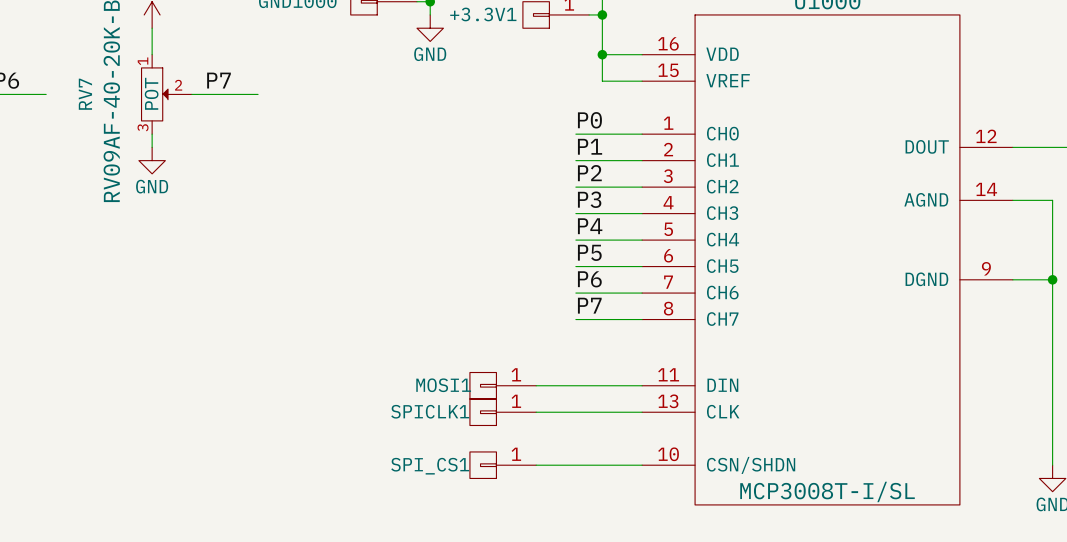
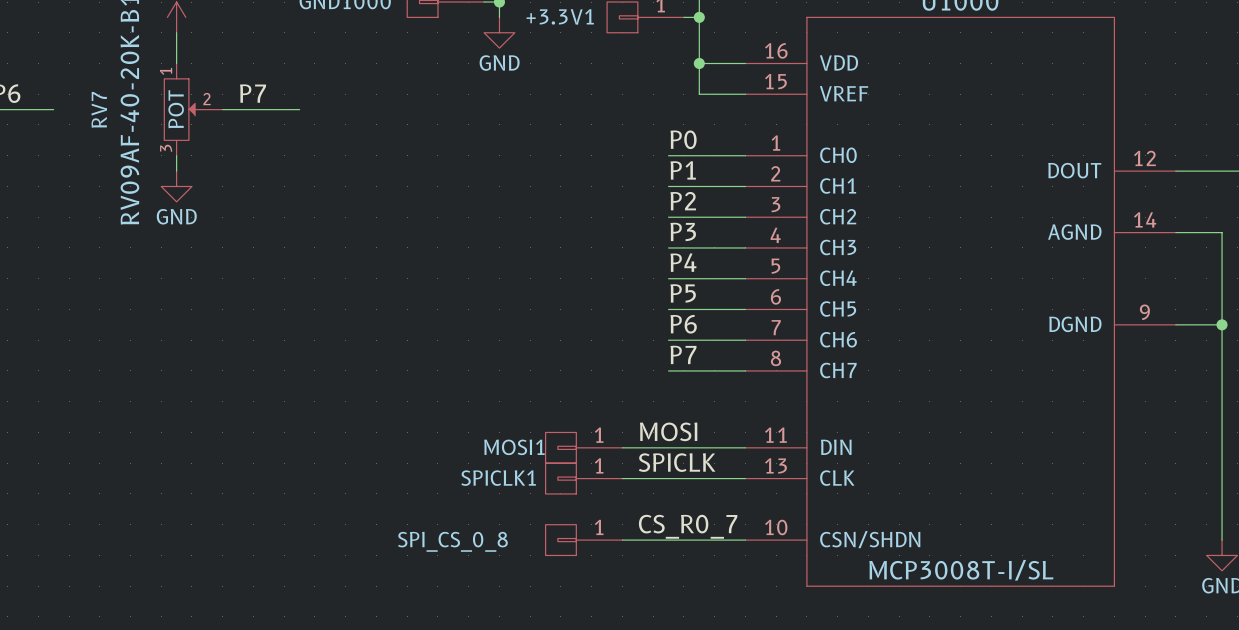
label: none -> MOSI (668, 431)
label: none -> SPICLK (677, 462)
label: none -> CS_R0_7 (688, 526)
SPI_CS1 name: SPI_CS1 (430, 466) -> SPI_CS_0_8 (452, 541)

